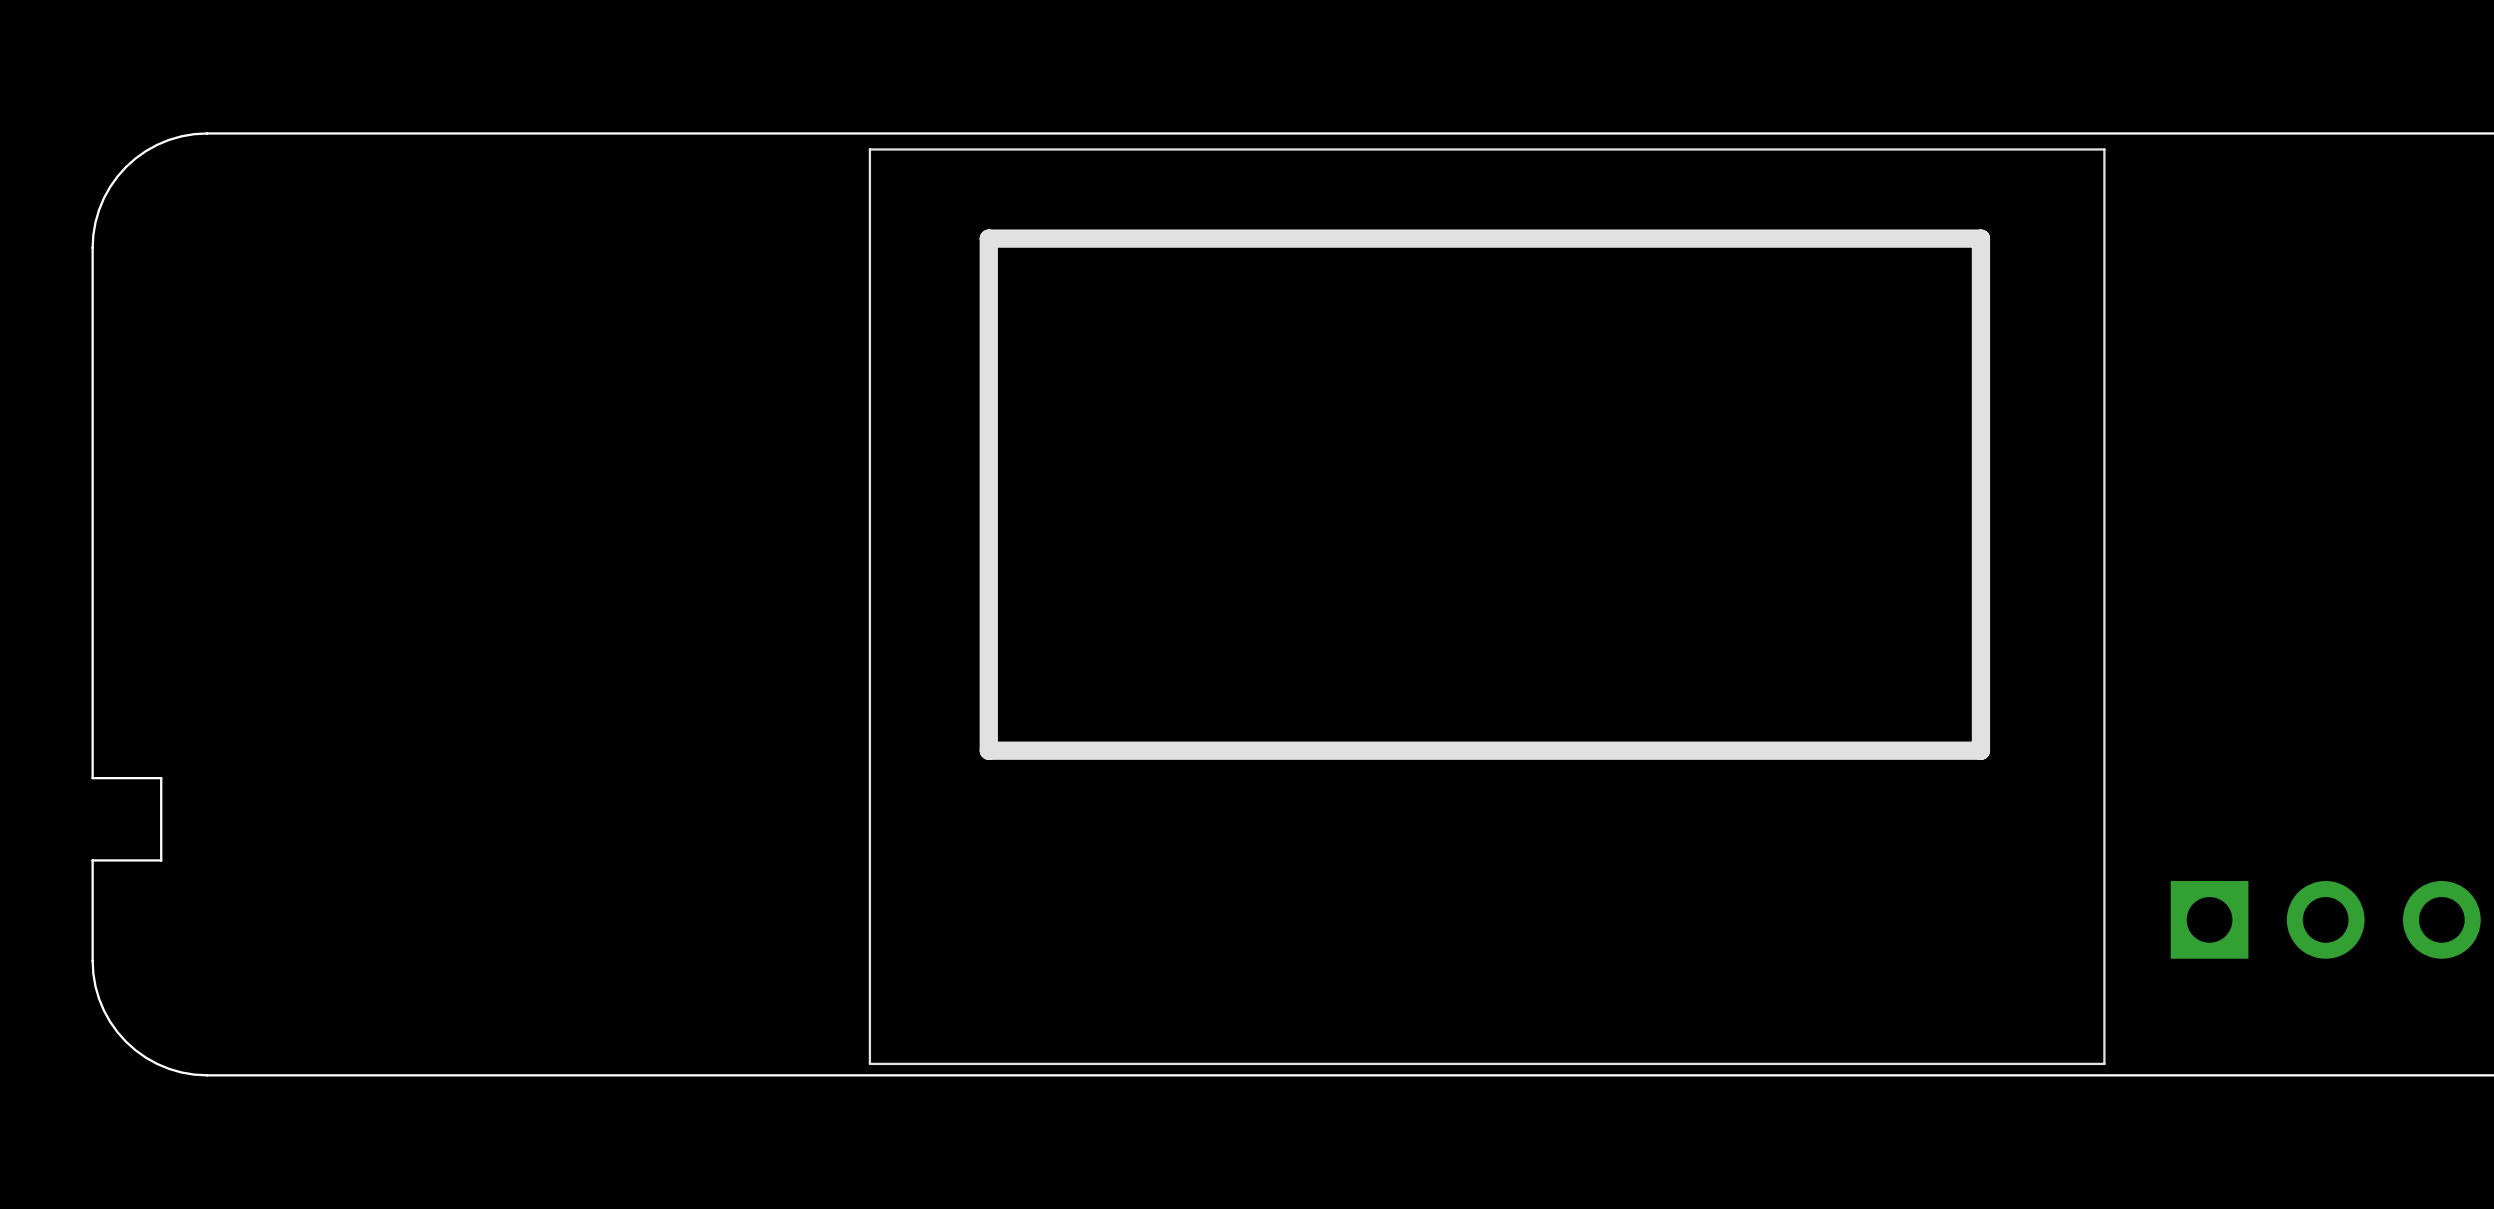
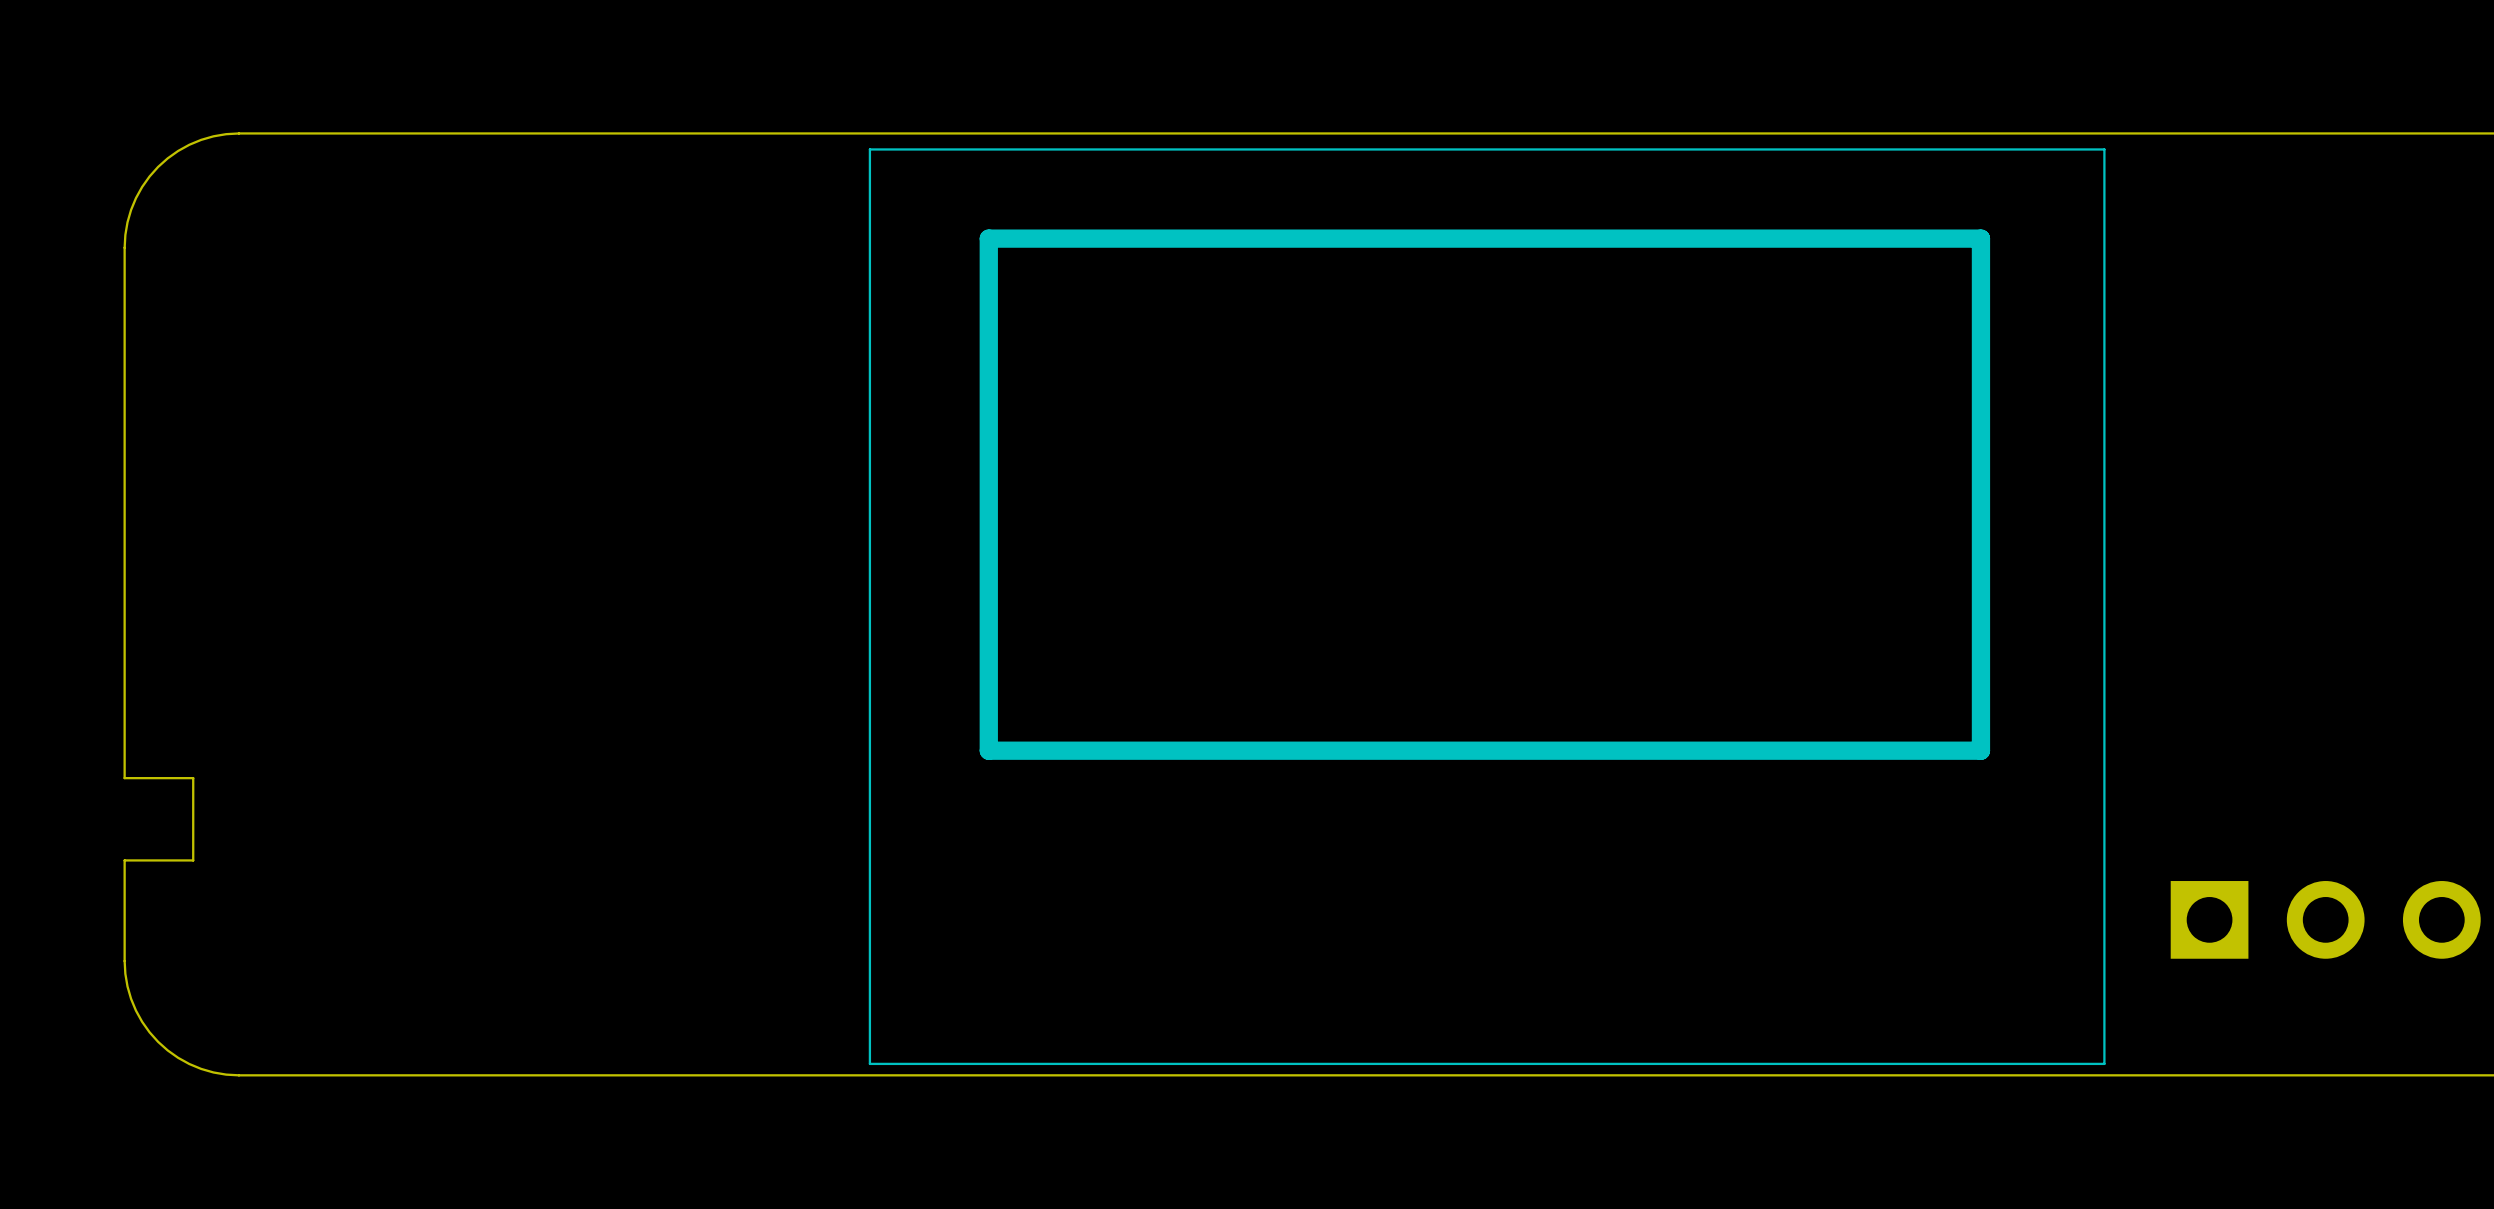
board edge: (238, 133) (206, 133) (181, 136) (146, 150) (117, 176) (103, 198) (95, 222) (92, 247) (92, 778) (124, 778) -> (238, 133) (201, 139) (167, 158) (142, 186) (127, 222) (124, 247) (124, 778)
board edge: (161, 778) (161, 860) -> (161, 778) (193, 778) (193, 860) (161, 860)
board edge: (124, 860) (92, 860) (93, 973) (103, 1010) (126, 1041) (157, 1064) (194, 1074) (238, 1075) -> (124, 860) (125, 973) (135, 1010) (149, 1032) (178, 1057) (213, 1072) (238, 1075)

